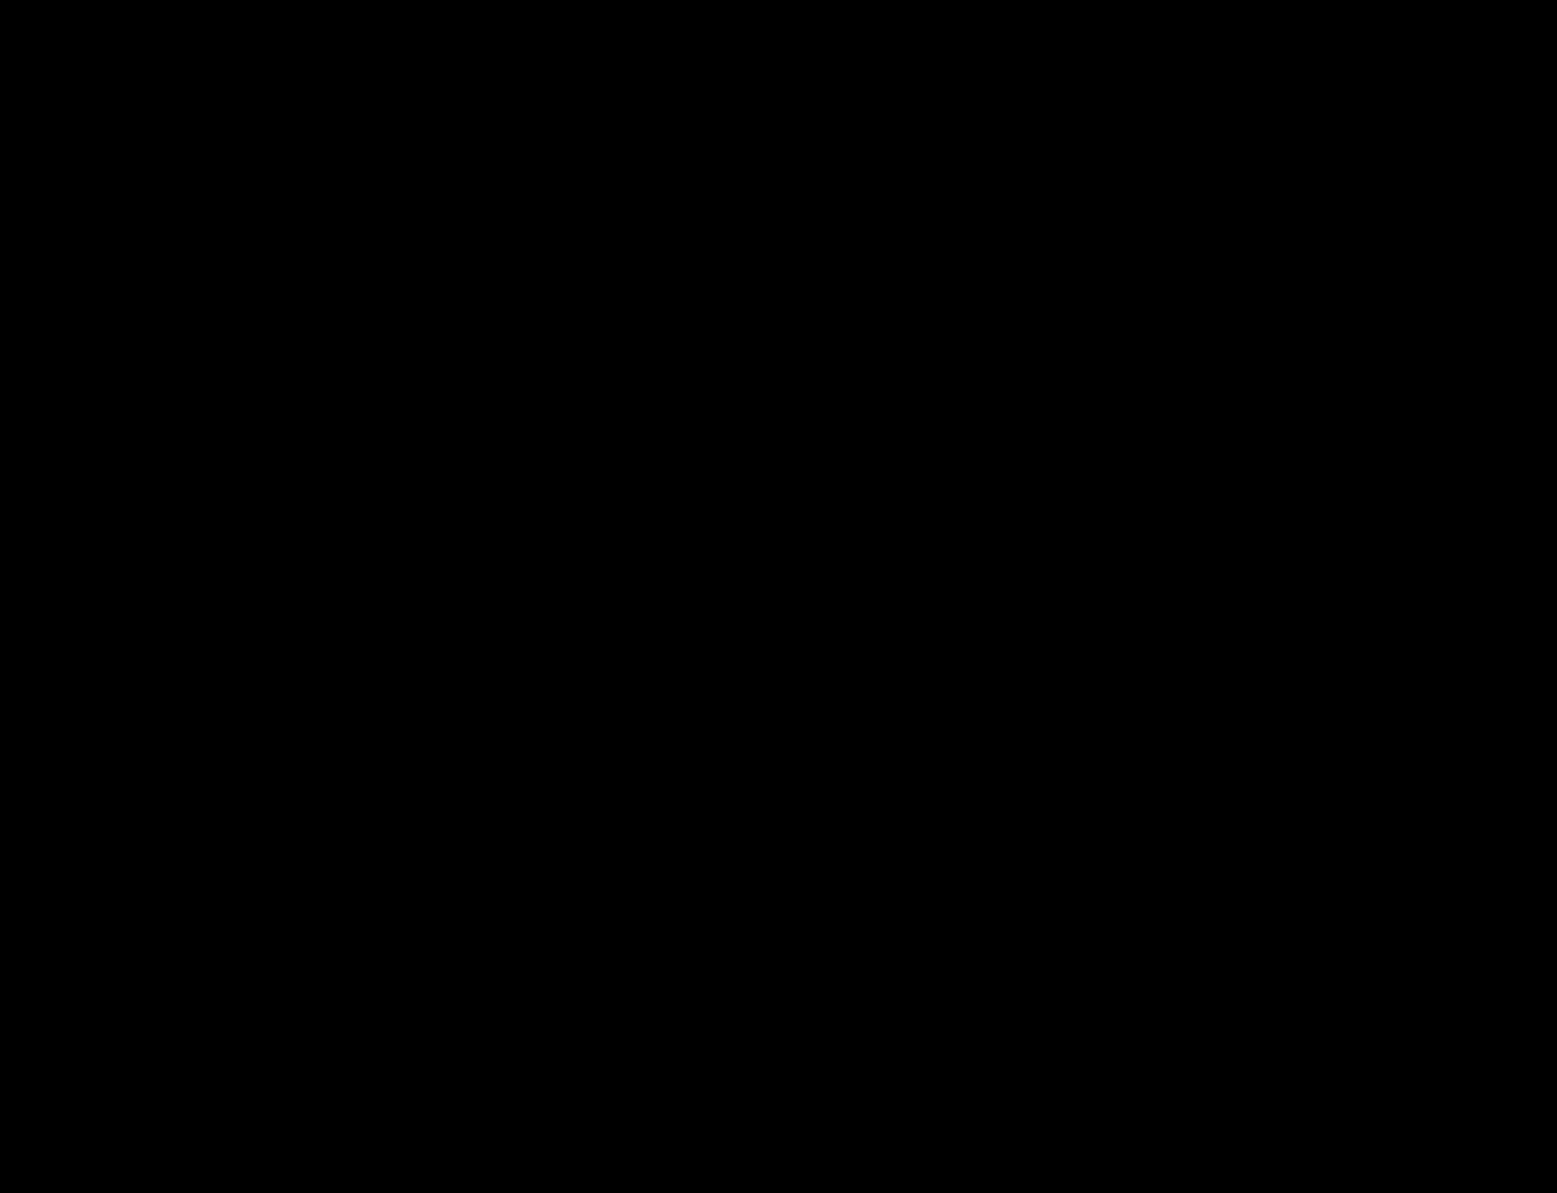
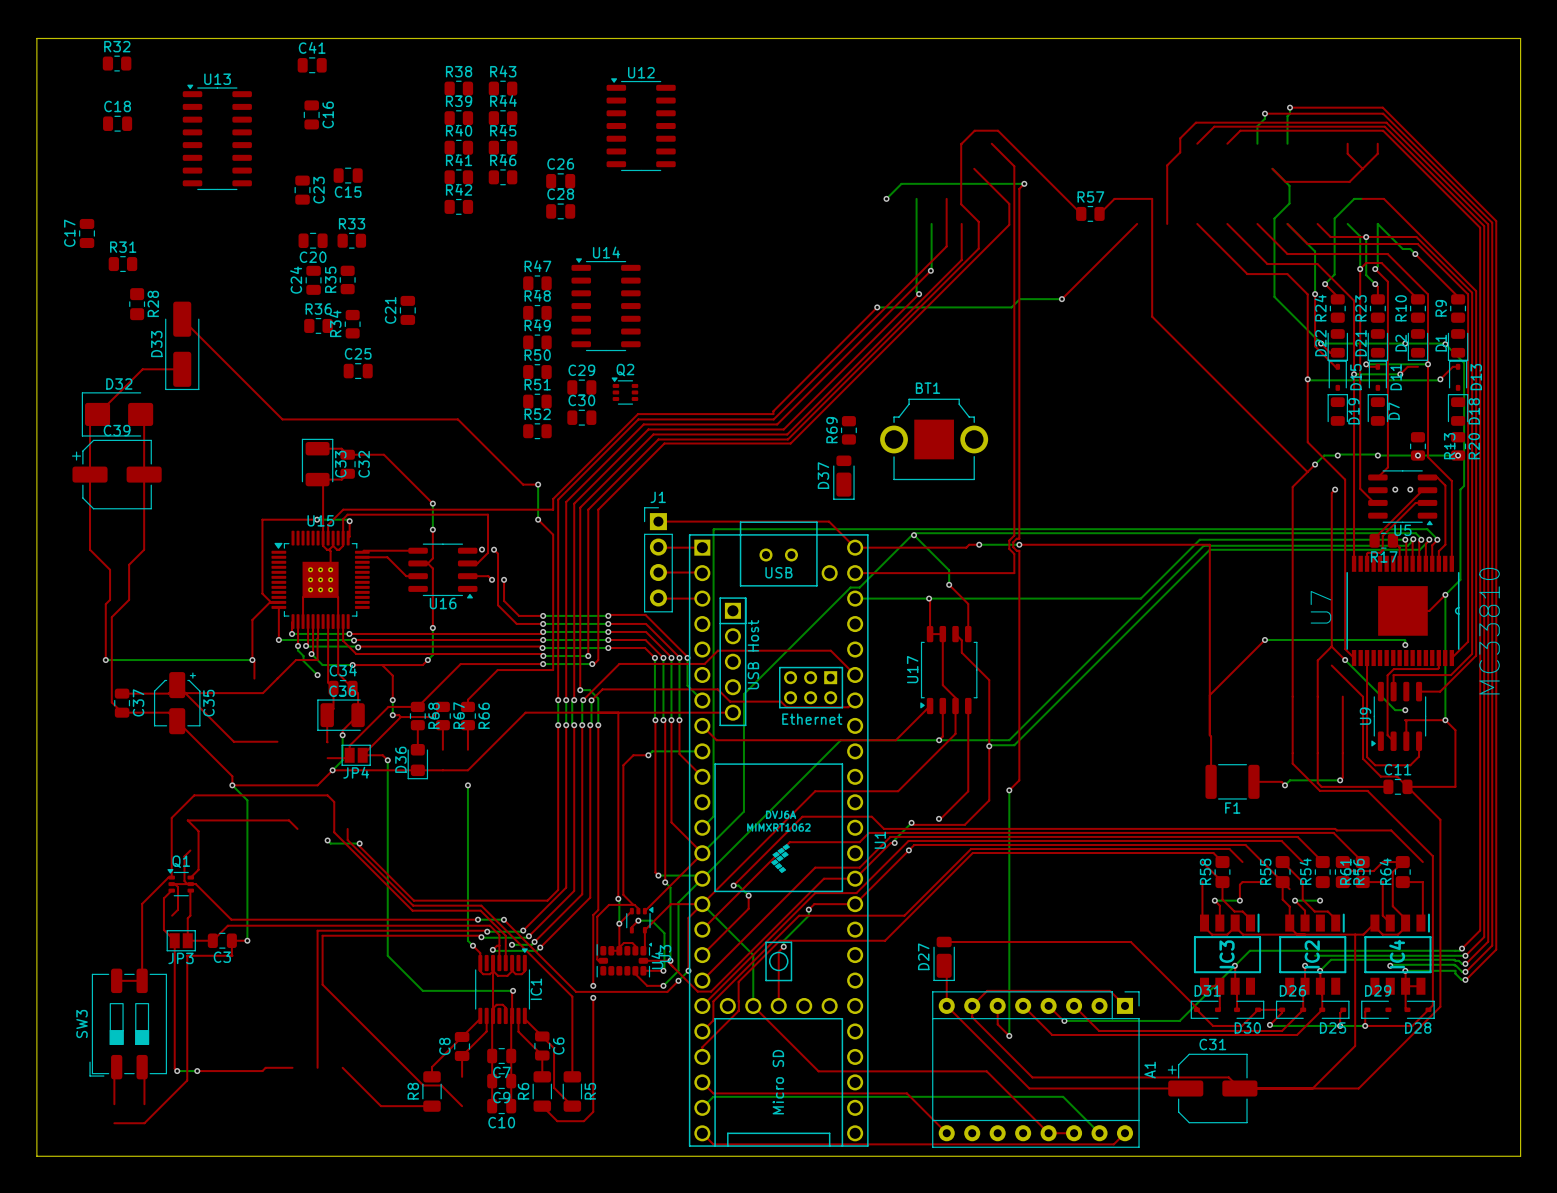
board edge: none -> (36, 38) (1520, 38) (1520, 1156) (36, 1156) (36, 38)
R32: none -> (117, 63)
C41: none -> (312, 65)
R38: none -> (458, 88)
R43: none -> (503, 88)
top track: none -> (1290, 107) (1382, 107) (1496, 221) (1496, 949) (1465, 979)
bottom track: none -> (1290, 107) (1290, 113) (1287, 116) (1287, 143)
via: none -> (1290, 107)
top track: none -> (1264, 113) (1383, 113) (1492, 222) (1492, 945) (1465, 971)
bottom track: none -> (1264, 113) (1264, 118) (1257, 126) (1257, 143)
via: none -> (1264, 113)
C16: none -> (311, 114)
R39: none -> (458, 118)
R44: none -> (503, 118)
C18: none -> (117, 123)
U12: none -> (641, 124)
U13: none -> (217, 137)
top track: none -> (991, 143) (1014, 166) (1014, 535) (1009, 540) (1009, 548) (1014, 553) (1014, 573) (855, 573)
top track: none -> (1197, 143) (1214, 126) (1384, 126) (1484, 226) (1484, 937) (1465, 955)
top track: none -> (1227, 143) (1240, 130) (1383, 130) (1480, 227) (1480, 930) (1462, 948)
top track: none -> (1347, 143) (1347, 153) (1362, 168)
top track: none -> (1377, 143) (1377, 153) (1349, 181) (1285, 181) (1272, 168)
R40: none -> (458, 147)
R45: none -> (503, 147)
top track: none -> (974, 168) (1009, 203) (1009, 224) (790, 443) (664, 443) (598, 509) (598, 660) (592, 664)
bottom track: none -> (1272, 168) (1289, 185) (1289, 203) (1274, 218) (1274, 296) (1321, 343) (1444, 343) (1464, 362) (1464, 485) (1460, 489) (1460, 579) (1445, 594) (1445, 720)
C15: none -> (348, 175)
R41: none -> (458, 177)
R46: none -> (503, 177)
C26: none -> (560, 181)
top track: none -> (1024, 183) (1019, 188) (1019, 538) (1013, 542) (1013, 547) (1019, 550) (1019, 780) (1009, 790)
bottom track: none -> (1024, 183) (901, 183) (886, 198)
via: none -> (1024, 183)
C23: none -> (302, 190)
via: none -> (886, 198)
bottom track: none -> (916, 198) (916, 291) (919, 294)
top track: none -> (946, 198) (946, 246) (773, 419) (638, 419) (558, 499) (558, 700)
top track: none -> (1362, 198) (1383, 198) (1476, 291) (1476, 655) (1440, 691) (1419, 691)
bottom track: none -> (1362, 198) (1354, 198) (1334, 218) (1334, 274) (1325, 284)
R42: none -> (458, 206)
C28: none -> (560, 211)
top track: none -> (1081, 213) (998, 130) (974, 130) (961, 144) (961, 204) (978, 221) (978, 248) (787, 439) (658, 439) (588, 509) (588, 656)
R57: none -> (1090, 213)
top track: none -> (1099, 213) (1114, 198) (1152, 198) (1152, 316) (1307, 472)
bottom track: none -> (931, 223) (930, 270)
top track: none -> (961, 223) (961, 260) (787, 434) (653, 434) (580, 507) (580, 690)
top track: none -> (1137, 223) (1061, 299)
top track: none -> (1167, 223) (1167, 165) (1180, 152) (1180, 138) (1195, 122) (1386, 122) (1488, 224) (1488, 941) (1465, 963)
top track: none -> (1197, 223) (1247, 274) (1287, 274) (1307, 294) (1307, 442) (1345, 479) (1345, 649) (1354, 658)
top track: none -> (1227, 223) (1267, 264) (1317, 264) (1354, 300) (1354, 563)
top track: none -> (1257, 223) (1287, 254) (1387, 254) (1428, 294) (1428, 457) (1451, 481) (1451, 563)
top track: none -> (1287, 223) (1307, 244) (1417, 244) (1468, 294) (1468, 641) (1451, 658)
bottom track: none -> (1287, 223) (1315, 251) (1315, 294)
top track: none -> (1317, 223) (1330, 236) (1416, 236) (1472, 292) (1472, 653) (1451, 675) (1393, 675) (1393, 691)
bottom track: none -> (1347, 223) (1360, 236) (1360, 269)
C17: none -> (87, 233)
bottom track: none -> (1366, 237) (1366, 275) (1375, 284)
via: none -> (1366, 237)
C20: none -> (313, 240)
R33: none -> (351, 240)
top track: none -> (1415, 254) (1458, 296) (1458, 299)
bottom track: none -> (1415, 254) (1410, 249) (1402, 249) (1377, 223) (1377, 266) (1375, 269)
via: none -> (1415, 254)
R31: none -> (122, 264)
via: none -> (1360, 269)
top track: none -> (1375, 269) (1387, 281) (1387, 467) (1377, 477)
via: none -> (1375, 269)
top track: none -> (930, 270) (777, 424) (643, 424) (566, 501) (566, 700)
via: none -> (930, 270)
R35: none -> (347, 279)
C24: none -> (313, 280)
R47: none -> (537, 283)
top track: none -> (1325, 284) (1337, 296) (1337, 299)
via: none -> (1325, 284)
top track: none -> (1375, 284) (1377, 286) (1377, 299)
via: none -> (1375, 284)
top track: none -> (919, 294) (783, 429) (648, 429) (574, 503) (574, 700)
via: none -> (919, 294)
top track: none -> (1315, 294) (1315, 346) (1335, 366) (1337, 366)
via: none -> (1315, 294)
bottom track: none -> (1061, 299) (1019, 299) (1011, 307) (877, 307)
via: none -> (1061, 299)
top track: none -> (1417, 299) (1381, 263) (1366, 263) (1360, 269) (1360, 488) (1374, 502) (1377, 502)
R28: none -> (137, 304)
U14: none -> (606, 304)
top track: none -> (877, 307) (773, 411) (773, 414) (638, 414) (553, 498) (553, 509) (343, 509) (328, 524) (328, 538)
via: none -> (877, 307)
R24: none -> (1337, 308)
R23: none -> (1377, 308)
R10: none -> (1417, 308)
R9: none -> (1458, 308)
C21: none -> (407, 310)
R48: none -> (537, 312)
top track: none -> (182, 319) (282, 419) (457, 419) (523, 484) (538, 484)
R34: none -> (352, 324)
R36: none -> (318, 325)
R49: none -> (537, 342)
top track: none -> (1321, 343) (1330, 352) (1337, 352)
via: none -> (1321, 343)
via: none -> (1405, 343)
D22: none -> (1337, 344)
D21: none -> (1377, 344)
D2: none -> (1417, 344)
via: none -> (1445, 344)
D1: none -> (1458, 344)
D33: none -> (182, 345)
top track: none -> (1366, 364) (1368, 366) (1377, 366)
bottom track: none -> (1366, 364) (1428, 364)
via: none -> (1366, 364)
via: none -> (1428, 364)
top track: none -> (1417, 366) (1407, 366) (1400, 374)
top track: none -> (1458, 366) (1452, 366) (1440, 379)
top track: none -> (182, 369) (142, 369) (90, 421) (90, 549) (110, 569) (110, 599) (105, 604) (105, 660)
C25: none -> (358, 371)
R50: none -> (537, 372)
bottom track: none -> (1354, 374) (1400, 374)
via: none -> (1354, 374)
via: none -> (1400, 374)
D15: none -> (1337, 375)
D11: none -> (1377, 375)
D13: none -> (1458, 375)
bottom track: none -> (1307, 379) (1440, 379)
via: none -> (1307, 379)
via: none -> (1440, 379)
C29: none -> (581, 387)
Q2: none -> (624, 391)
R51: none -> (537, 401)
D19: none -> (1337, 409)
D7: none -> (1377, 409)
D18: none -> (1458, 409)
D32: none -> (117, 414)
top track: none -> (140, 414) (144, 417) (144, 549) (129, 564) (129, 599) (111, 617) (111, 702) (122, 712) (168, 712) (232, 776) (232, 785) (317, 785) (332, 770) (467, 770) (525, 712) (732, 712)
C30: none -> (581, 417)
R69: none -> (848, 430)
R52: none -> (537, 431)
BT1: none -> (934, 439)
R13: none -> (1417, 446)
R20: none -> (1458, 446)
top track: none -> (317, 448) (341, 448) (347, 454) (383, 454) (432, 503)
via: none -> (1337, 455)
via: none -> (1377, 455)
via: none -> (1417, 455)
bottom track: none -> (1458, 455) (1338, 454) (1324, 455) (1315, 464)
via: none -> (1458, 455)
C33: none -> (317, 462)
C32: none -> (347, 464)
top track: none -> (1315, 464) (1292, 486) (1292, 763) (1319, 790) (1367, 790) (1432, 856) (1432, 1005) (1412, 1025) (1365, 1025) (1365, 1011) (1367, 1009)
via: none -> (1315, 464)
top track: none -> (347, 473) (341, 479) (317, 479) (323, 485) (323, 545) (329, 549)
C39: none -> (116, 474)
D37: none -> (843, 477)
top track: none -> (1427, 477) (1437, 477) (1445, 485) (1445, 544) (1438, 551) (1438, 563)
bottom track: none -> (538, 484) (538, 519)
via: none -> (538, 484)
top track: none -> (1335, 489) (1331, 492) (1331, 646) (1345, 660)
via: none -> (1335, 489)
via: none -> (1395, 489)
via: none -> (1410, 489)
top track: none -> (1422, 490) (1374, 538) (1374, 540)
U5: none -> (1402, 497)
top track: none -> (1427, 502) (1415, 502) (1382, 535) (1382, 550) (1380, 552) (1368, 552) (1367, 563)
bottom track: none -> (432, 503) (432, 529)
via: none -> (432, 503)
top track: none -> (317, 519) (262, 519) (262, 593) (271, 602)
bottom track: none -> (317, 519) (349, 521)
via: none -> (317, 519)
top track: none -> (538, 519) (553, 534) (553, 670) (497, 670) (467, 699) (467, 706)
via: none -> (538, 519)
top track: none -> (349, 521) (348, 538)
via: none -> (349, 521)
top track: none -> (658, 521) (829, 521) (855, 547) (966, 547) (969, 544) (979, 544)
top track: none -> (432, 529) (432, 558) (427, 563)
via: none -> (432, 529)
bottom track: none -> (914, 535) (949, 570) (949, 584)
via: none -> (914, 535)
top track: none -> (1405, 539) (1406, 563)
bottom track: none -> (1405, 539) (1199, 539) (1140, 598) (855, 598)
via: none -> (1405, 539)
top track: none -> (1413, 539) (1412, 563)
bottom track: none -> (1413, 539) (1411, 539) (1407, 545) (1203, 545) (1009, 740) (840, 740) (678, 902) (678, 970) (663, 985)
via: none -> (1413, 539)
top track: none -> (1421, 539) (1419, 541) (1419, 563)
bottom track: none -> (1421, 539) (1415, 533) (914, 533) (859, 587) (850, 587) (743, 694) (743, 811) (702, 853)
via: none -> (1421, 539)
top track: none -> (1429, 539) (1425, 543) (1425, 563)
bottom track: none -> (1429, 539) (1419, 549) (1209, 549) (1014, 745) (988, 745)
via: none -> (1429, 539)
top track: none -> (1437, 539) (1432, 545) (1432, 563)
bottom track: none -> (1437, 539) (1427, 529) (714, 529) (713, 816) (702, 827)
via: none -> (1437, 539)
R17: none -> (1383, 540)
top track: none -> (1392, 540) (1399, 547) (1399, 563)
bottom track: none -> (979, 544) (1019, 544)
via: none -> (979, 544)
top track: none -> (1019, 544) (1209, 544) (1211, 781)
via: none -> (1019, 544)
top track: none -> (333, 545) (329, 549)
top track: none -> (333, 545) (337, 549) (343, 545) (343, 519) (347, 514) (488, 514) (488, 552) (477, 563) (467, 563)
top track: none -> (658, 547) (702, 547)
top track: none -> (329, 549) (330, 569)
via: none -> (481, 549)
top track: none -> (494, 549) (498, 553) (498, 605) (516, 623) (543, 623)
via: none -> (494, 549)
top track: none -> (418, 550) (363, 550) (362, 552)
top track: none -> (362, 557) (387, 557) (406, 576) (418, 576)
J1: none -> (658, 559)
top track: none -> (427, 563) (432, 568) (432, 627)
U16: none -> (442, 570)
top track: none -> (658, 572) (702, 573)
top track: none -> (467, 576) (488, 576) (492, 579)
U15: none -> (320, 579)
via: none -> (492, 579)
top track: none -> (504, 579) (504, 600) (519, 615) (543, 615)
via: none -> (504, 579)
top track: none -> (949, 584) (968, 603) (968, 634)
via: none -> (949, 584)
top track: none -> (310, 589) (303, 597) (303, 621)
top track: none -> (330, 589) (338, 597) (338, 673) (358, 693) (358, 715) (342, 730) (342, 735)
top track: none -> (1445, 594) (1429, 610) (1402, 610)
via: none -> (1445, 594)
top track: none -> (658, 597) (702, 598)
top track: none -> (929, 598) (930, 634) (942, 634) (942, 685) (955, 697) (955, 733) (898, 791) (815, 791) (688, 917) (688, 970)
via: none -> (929, 598)
top track: none -> (278, 602) (269, 602) (252, 619) (254, 678)
top track: none -> (278, 607) (278, 639)
U7: none -> MC33810 (1402, 610)
bottom track: none -> (543, 615) (608, 615)
via: none -> (543, 615)
top track: none -> (608, 615) (645, 614) (687, 657)
via: none -> (608, 615)
top track: none -> (293, 621) (292, 633)
top track: none -> (298, 621) (298, 646)
top track: none -> (308, 621) (308, 644) (306, 646)
top track: none -> (313, 621) (311, 654)
top track: none -> (318, 621) (317, 660) (296, 660) (262, 693) (185, 693)
top track: none -> (328, 621) (328, 682) (333, 687) (333, 708) (327, 715) (327, 742)
top track: none -> (343, 621) (343, 640) (356, 654) (543, 654) (543, 655)
bottom track: none -> (543, 623) (608, 623)
via: none -> (543, 623)
top track: none -> (608, 623) (646, 623) (679, 657)
via: none -> (608, 623)
bottom track: none -> (432, 627) (432, 655) (427, 660)
via: none -> (432, 627)
top track: none -> (543, 631) (541, 633) (349, 633)
bottom track: none -> (543, 631) (608, 631)
via: none -> (543, 631)
top track: none -> (608, 631) (646, 631) (671, 657)
via: none -> (608, 631)
bottom track: none -> (292, 633) (349, 633)
via: none -> (292, 633)
via: none -> (349, 633)
top track: none -> (955, 634) (961, 640) (961, 652) (989, 680) (989, 800) (964, 824) (913, 824) (911, 822)
bottom track: none -> (278, 639) (354, 640)
via: none -> (278, 639)
top track: none -> (543, 639) (354, 640)
bottom track: none -> (543, 639) (608, 639)
via: none -> (543, 639)
top track: none -> (608, 639) (645, 639) (663, 657)
via: none -> (608, 639)
top track: none -> (1264, 639) (1209, 695)
bottom track: none -> (1264, 639) (1404, 639) (1405, 645)
via: none -> (1264, 639)
via: none -> (354, 640)
via: none -> (1405, 645)
bottom track: none -> (298, 646) (298, 650) (303, 656) (303, 661) (317, 675)
via: none -> (298, 646)
bottom track: none -> (306, 646) (358, 647)
via: none -> (306, 646)
top track: none -> (1331, 646) (1317, 660) (1317, 782) (1321, 786) (1388, 786)
top track: none -> (358, 647) (542, 648)
via: none -> (358, 647)
bottom track: none -> (542, 648) (608, 648)
via: none -> (542, 648)
top track: none -> (608, 648) (645, 648) (654, 657)
via: none -> (608, 648)
bottom track: none -> (311, 654) (322, 665) (352, 665)
via: none -> (311, 654)
via: none -> (543, 655)
bottom track: none -> (543, 656) (588, 656)
via: none -> (588, 656)
bottom track: none -> (654, 657) (655, 720)
via: none -> (654, 657)
bottom track: none -> (663, 657) (663, 720)
via: none -> (663, 657)
bottom track: none -> (671, 657) (671, 720)
via: none -> (671, 657)
bottom track: none -> (679, 657) (679, 720)
via: none -> (679, 657)
bottom track: none -> (687, 657) (687, 685) (702, 700)
via: none -> (687, 657)
top track: none -> (1367, 658) (1367, 757) (1375, 765) (1410, 765) (1419, 756) (1419, 741)
top track: none -> (1438, 658) (1437, 669) (1393, 669) (1387, 675) (1387, 735) (1393, 741)
bottom track: none -> (105, 660) (252, 660)
via: none -> (105, 660)
via: none -> (252, 660)
top track: none -> (427, 660) (422, 665) (352, 665)
via: none -> (427, 660)
bottom track: none -> (1345, 660) (1395, 710) (1405, 710)
via: none -> (1345, 660)
top track: none -> (543, 664) (460, 664) (417, 706) (388, 706) (349, 745) (349, 755) (346, 758) (327, 758)
bottom track: none -> (543, 664) (592, 664)
via: none -> (543, 664)
via: none -> (592, 664)
via: none -> (352, 665)
top track: none -> (382, 665) (392, 675) (392, 700)
top track: none -> (1331, 665) (1363, 696) (1363, 758) (1380, 776) (1397, 776) (1440, 819) (1440, 1006) (1358, 1088) (1239, 1088) (1228, 1077) (1032, 1077) (972, 1017) (972, 1005) (987, 990) (1109, 990) (1125, 1005)
U17: none -> (948, 670)
top track: none -> (855, 674) (830, 650) (717, 650) (704, 663) (619, 663) (583, 700)
via: none -> (317, 675)
C34: none -> (343, 687)
bottom track: none -> (580, 690) (589, 690) (598, 698) (598, 725)
via: none -> (580, 690)
top track: none -> (122, 693) (168, 693) (177, 685) (233, 741) (277, 741)
top track: none -> (1342, 696) (1342, 777) (1340, 780)
bottom track: none -> (392, 700) (392, 715)
via: none -> (392, 700)
bottom track: none -> (558, 700) (558, 725)
via: none -> (558, 700)
bottom track: none -> (566, 700) (566, 725)
via: none -> (566, 700)
bottom track: none -> (574, 700) (572, 702) (572, 723) (574, 725)
via: none -> (574, 700)
bottom track: none -> (583, 700) (582, 725)
via: none -> (583, 700)
top track: none -> (591, 700) (602, 689) (717, 689) (730, 701) (780, 701) (786, 707) (848, 707) (855, 700)
bottom track: none -> (591, 700) (590, 725)
via: none -> (591, 700)
C37: none -> (122, 703)
C35: none -> (177, 703)
top track: none -> (442, 706) (432, 717) (400, 717)
top track: none -> (930, 706) (895, 740) (716, 740) (702, 725)
top track: none -> (942, 706) (942, 736) (939, 740)
top track: none -> (968, 706) (968, 791) (938, 818)
via: none -> (1405, 710)
top track: none -> (618, 712) (618, 898)
C36: none -> (341, 715)
top track: none -> (392, 715) (400, 717)
via: none -> (392, 715)
R68: none -> (417, 716)
R67: none -> (442, 716)
R66: none -> (467, 716)
U9: none -> (1398, 716)
top track: none -> (400, 717) (362, 755) (382, 755) (387, 760)
top track: none -> (655, 720) (655, 872) (658, 875)
via: none -> (655, 720)
top track: none -> (663, 720) (665, 721) (665, 882)
via: none -> (663, 720)
top track: none -> (671, 720) (671, 822) (702, 853) (644, 911)
via: none -> (671, 720)
top track: none -> (679, 720) (679, 753) (702, 776)
via: none -> (679, 720)
via: none -> (1445, 720)
top track: none -> (417, 725) (417, 749)
top track: none -> (442, 725) (442, 749)
top track: none -> (467, 725) (467, 749)
top track: none -> (558, 725) (558, 889) (547, 900) (413, 900) (359, 846) (359, 843)
via: none -> (558, 725)
top track: none -> (566, 725) (566, 887) (523, 930)
via: none -> (566, 725)
top track: none -> (574, 725) (574, 890) (528, 936)
via: none -> (574, 725)
top track: none -> (582, 725) (582, 894) (534, 941)
via: none -> (582, 725)
top track: none -> (590, 725) (590, 897) (540, 947)
via: none -> (590, 725)
top track: none -> (598, 725) (598, 909) (593, 915) (593, 985)
via: none -> (598, 725)
bottom track: none -> (342, 735) (342, 760) (332, 770)
via: none -> (342, 735)
via: none -> (939, 740)
top track: none -> (1406, 741) (1405, 720) (1445, 720) (1455, 730) (1455, 786) (1407, 786)
via: none -> (989, 746)
bottom track: none -> (702, 751) (652, 751) (648, 755)
JP4: none -> (356, 755)
top track: none -> (648, 755) (633, 755) (623, 765) (623, 894) (633, 904)
via: none -> (648, 755)
bottom track: none -> (387, 760) (387, 955) (422, 990) (513, 990)
via: none -> (387, 760)
D36: none -> (417, 761)
via: none -> (332, 770)
bottom track: none -> (1340, 780) (1290, 780) (1285, 785)
via: none -> (1340, 780)
F1: none -> (1232, 781)
top track: none -> (1253, 781) (1281, 781) (1285, 785)
bottom track: none -> (232, 785) (247, 800) (247, 940)
via: none -> (232, 785)
bottom track: none -> (467, 785) (467, 940) (472, 945)
via: none -> (467, 785)
via: none -> (1285, 785)
C11: none -> (1397, 786)
bottom track: none -> (1009, 790) (1009, 1035)
via: none -> (1009, 790)
via: none -> (938, 818)
bottom track: none -> (911, 822) (894, 839) (894, 842)
via: none -> (911, 822)
top track: none -> (297, 828) (289, 820) (187, 820) (198, 831) (198, 869) (190, 877)
top track: none -> (347, 828) (347, 840) (413, 905) (481, 905) (572, 996) (572, 1076)
U1: none -> (778, 834)
bottom track: none -> (327, 840) (330, 843) (359, 843)
via: none -> (327, 840)
top track: none -> (894, 842) (890, 842) (855, 878) (823, 878) (711, 991) (697, 991) (666, 960) (643, 960)
via: none -> (894, 842)
via: none -> (359, 843)
top track: none -> (190, 850) (184, 856) (184, 881) (187, 884)
via: none -> (908, 850)
top track: none -> (1202, 862) (1222, 882) (1222, 899) (1234, 911) (1242, 911) (1250, 919) (1250, 923)
top track: none -> (1222, 862) (1213, 853) (972, 853) (885, 940) (779, 940) (738, 981) (738, 1010)
top track: none -> (1242, 862) (1229, 848) (971, 848) (904, 915) (799, 915) (713, 1001) (713, 1020) (702, 1031)
top track: none -> (1282, 862) (1302, 882) (1302, 899) (1314, 911) (1327, 911) (1335, 919) (1335, 923)
top track: none -> (1302, 862) (1281, 840) (908, 840) (856, 893) (815, 893) (702, 1006)
top track: none -> (1322, 862) (1297, 836) (890, 836) (859, 867) (815, 867) (702, 980)
top track: none -> (1342, 862) (1351, 871) (1373, 871) (1382, 862) (1402, 862) (1392, 872) (1392, 906) (1405, 919) (1405, 927) (1398, 934) (1382, 934) (1374, 926) (1374, 923) (1363, 934) (1242, 934) (1235, 926)
top track: none -> (1362, 862) (1333, 832) (868, 832) (859, 842) (789, 842) (702, 929)
top track: none -> (1422, 862) (1391, 830) (884, 828) (871, 816) (802, 816) (733, 885)
R58: none -> (1222, 872)
R55: none -> (1282, 872)
R54: none -> (1322, 872)
R56: none -> (1342, 872)
R61: none -> (1362, 872)
R64: none -> (1402, 872)
bottom track: none -> (658, 875) (699, 875) (702, 878)
via: none -> (658, 875)
Q1: none -> (180, 882)
bottom track: none -> (665, 882) (670, 887) (670, 960)
via: none -> (665, 882)
top track: none -> (1202, 882) (1202, 921) (1204, 927) (1212, 934) (1227, 934) (1235, 926)
top track: none -> (1262, 882) (1242, 882) (1239, 884) (1239, 900)
top track: none -> (1282, 882) (1282, 899) (1289, 906) (1289, 927) (1297, 934)
top track: none -> (1362, 882) (1382, 882) (1382, 915) (1390, 923)
top track: none -> (1402, 882) (1422, 882) (1422, 921) (1420, 923)
top track: none -> (171, 884) (195, 884) (231, 919) (477, 919)
top track: none -> (174, 884) (177, 887) (177, 909) (172, 915)
bottom track: none -> (733, 885) (738, 885) (748, 895)
via: none -> (733, 885)
top track: none -> (1289, 889) (1245, 844) (914, 844) (855, 904) (814, 904) (808, 909)
top track: none -> (171, 890) (163, 898) (163, 929) (174, 940) (174, 1068) (177, 1071)
top track: none -> (190, 890) (187, 940) (212, 940) (227, 925) (489, 925) (499, 935) (499, 963)
top track: none -> (748, 895) (748, 908) (702, 955)
via: none -> (748, 895)
bottom track: none -> (618, 898) (619, 923)
via: none -> (618, 898)
top track: none -> (1214, 900) (1219, 905) (1219, 923)
bottom track: none -> (1214, 900) (1239, 900)
via: none -> (1214, 900)
via: none -> (1239, 900)
top track: none -> (1295, 900) (1305, 910) (1305, 923)
bottom track: none -> (1295, 900) (1320, 900)
via: none -> (1295, 900)
via: none -> (1320, 900)
top track: none -> (702, 904) (670, 904) (644, 930) (643, 950)
bottom track: none -> (702, 904) (753, 955) (753, 1006)
bottom track: none -> (808, 909) (808, 915) (783, 940) (783, 946)
via: none -> (808, 909)
top track: none -> (631, 911) (619, 923) (619, 950) (611, 950)
top track: none -> (638, 911) (634, 904) (609, 904) (597, 916) (597, 959) (603, 960)
bottom track: none -> (477, 919) (502, 919)
via: none -> (477, 919)
top track: none -> (503, 919) (576, 991) (667, 991) (678, 980)
via: none -> (503, 919)
top track: none -> (638, 920) (631, 927) (631, 930)
bottom track: none -> (638, 920) (651, 920) (664, 933) (663, 970)
via: none -> (638, 920)
U3: none -> (639, 920)
via: none -> (619, 923)
bottom track: none -> (523, 930) (487, 931)
via: none -> (523, 930)
top track: none -> (487, 931) (317, 930) (317, 1067)
via: none -> (487, 931)
top track: none -> (1355, 934) (1355, 1046) (1312, 1088)
bottom track: none -> (528, 936) (481, 937)
via: none -> (528, 936)
top track: none -> (481, 937) (322, 935) (322, 984) (423, 1085) (441, 1085) (462, 1106)
via: none -> (481, 937)
JP3: none -> (181, 940)
C3: none -> (222, 940)
top track: none -> (247, 940) (231, 940) (232, 955) (187, 955) (187, 1080) (144, 1123) (114, 1123)
via: none -> (247, 940)
bottom track: none -> (534, 941) (531, 944) (511, 944)
via: none -> (534, 941)
top track: none -> (944, 941) (1130, 941) (1213, 1025) (1241, 1025) (1258, 1009) (1282, 1009) (1282, 1012) (1269, 1024)
via: none -> (511, 944)
top track: none -> (472, 945) (480, 953) (480, 971) (483, 974) (490, 974) (493, 971)
via: none -> (472, 945)
top track: none -> (499, 945) (492, 949)
top track: none -> (783, 946) (778, 951) (778, 1006)
via: none -> (783, 946)
bottom track: none -> (540, 947) (536, 950) (492, 949)
via: none -> (540, 947)
top track: none -> (619, 947) (623, 942) (632, 942) (635, 946) (635, 950)
bottom track: none -> (1462, 948) (1459, 950) (1249, 950) (1179, 1020) (1064, 1020)
via: none -> (1462, 948)
via: none -> (492, 949)
IC3: none -> (1227, 954)
IC2: none -> (1312, 954)
IC4: none -> (1397, 954)
bottom track: none -> (1315, 955) (1465, 955)
via: none -> (1465, 955)
D27: none -> (944, 958)
U4: none -> (624, 960)
via: none -> (670, 960)
top track: none -> (493, 963) (492, 1106)
top track: none -> (505, 963) (505, 935) (480, 910) (412, 910) (334, 832) (334, 802) (327, 795) (194, 795) (171, 817) (171, 877) (168, 877) (142, 903) (142, 980) (116, 980)
top track: none -> (512, 963) (512, 971) (507, 975) (498, 975) (493, 970)
top track: none -> (524, 963) (524, 971) (521, 974) (515, 974) (512, 970)
bottom track: none -> (1465, 963) (1454, 959) (1331, 959) (1320, 970)
via: none -> (1465, 963)
top track: none -> (944, 965) (946, 968) (946, 1005) (1029, 1088) (1185, 1088)
top track: none -> (1234, 965) (1237, 1009)
via: none -> (1234, 965)
top track: none -> (1305, 965) (1303, 1009) (1282, 1030) (1099, 1030) (1074, 1005)
via: none -> (1305, 965)
bottom track: none -> (1390, 965) (1454, 964) (1462, 971) (1465, 971)
via: none -> (1390, 965)
top track: none -> (635, 970) (635, 973) (647, 985) (663, 985)
top track: none -> (643, 970) (663, 970)
via: none -> (663, 970)
bottom track: none -> (688, 970) (678, 980)
via: none -> (688, 970)
top track: none -> (1320, 970) (1322, 1009) (1297, 1034) (1052, 1034) (1023, 1005)
via: none -> (1320, 970)
top track: none -> (1405, 970) (1405, 1007) (1407, 1009)
bottom track: none -> (1405, 970) (1455, 970) (1455, 973) (1461, 979) (1465, 979)
via: none -> (1405, 970)
via: none -> (1465, 971)
via: none -> (1465, 979)
via: none -> (678, 980)
via: none -> (593, 985)
via: none -> (663, 985)
IC1: none -> (502, 986)
top track: none -> (1204, 986) (1219, 986) (1219, 1007) (1217, 1009)
top track: none -> (1405, 986) (1420, 986)
top track: none -> (513, 990) (511, 1106)
via: none -> (513, 990)
top track: none -> (593, 997) (593, 1111) (583, 1121) (557, 1121) (542, 1106)
via: none -> (593, 997)
top track: none -> (997, 1005) (997, 1024) (1009, 1035)
top track: none -> (1048, 1005) (1064, 1020)
top track: none -> (753, 1006) (818, 1071) (986, 1071) (1048, 1133) (1074, 1133)
top track: none -> (493, 1008) (496, 1004) (502, 1004) (505, 1007) (505, 1015)
D31: none -> (1205, 1009)
D30: none -> (1249, 1009)
D26: none -> (1291, 1009)
D25: none -> (1334, 1009)
top track: none -> (1343, 1009) (1340, 1012) (1340, 1025)
D29: none -> (1376, 1009)
D28: none -> (1419, 1009)
top track: none -> (738, 1010) (702, 1047) (702, 1056)
top track: none -> (480, 1015) (480, 1018) (432, 1067) (432, 1076)
top track: none -> (486, 1015) (486, 1031) (462, 1056) (462, 1076)
top track: none -> (518, 1015) (518, 1031) (542, 1055) (542, 1076)
top track: none -> (524, 1015) (524, 1019) (554, 1048) (554, 1087) (572, 1106)
via: none -> (1064, 1020)
SW3: none -> (128, 1024)
bottom track: none -> (1269, 1024) (1365, 1025)
via: none -> (1269, 1024)
via: none -> (1340, 1025)
via: none -> (1365, 1025)
via: none -> (1009, 1035)
C8: none -> (462, 1046)
C6: none -> (542, 1046)
C7: none -> (501, 1056)
top track: none -> (116, 1067) (114, 1069) (114, 1104)
top track: none -> (142, 1067) (144, 1069) (144, 1104)
top track: none -> (292, 1067) (265, 1067) (262, 1071) (197, 1071)
top track: none -> (342, 1067) (380, 1106) (432, 1106)
A1: none -> (1035, 1069)
bottom track: none -> (177, 1071) (197, 1071)
via: none -> (177, 1071)
via: none -> (197, 1071)
C9: none -> (501, 1081)
top track: none -> (702, 1082) (713, 1093) (906, 1093) (946, 1133)
C31: none -> (1212, 1088)
R8: none -> (432, 1091)
R6: none -> (542, 1091)
R5: none -> (572, 1091)
C10: none -> (501, 1106)
bottom track: none -> (702, 1107) (713, 1096) (1063, 1096) (1099, 1133)
top track: none -> (1125, 1133) (1113, 1144) (713, 1144) (702, 1133)

